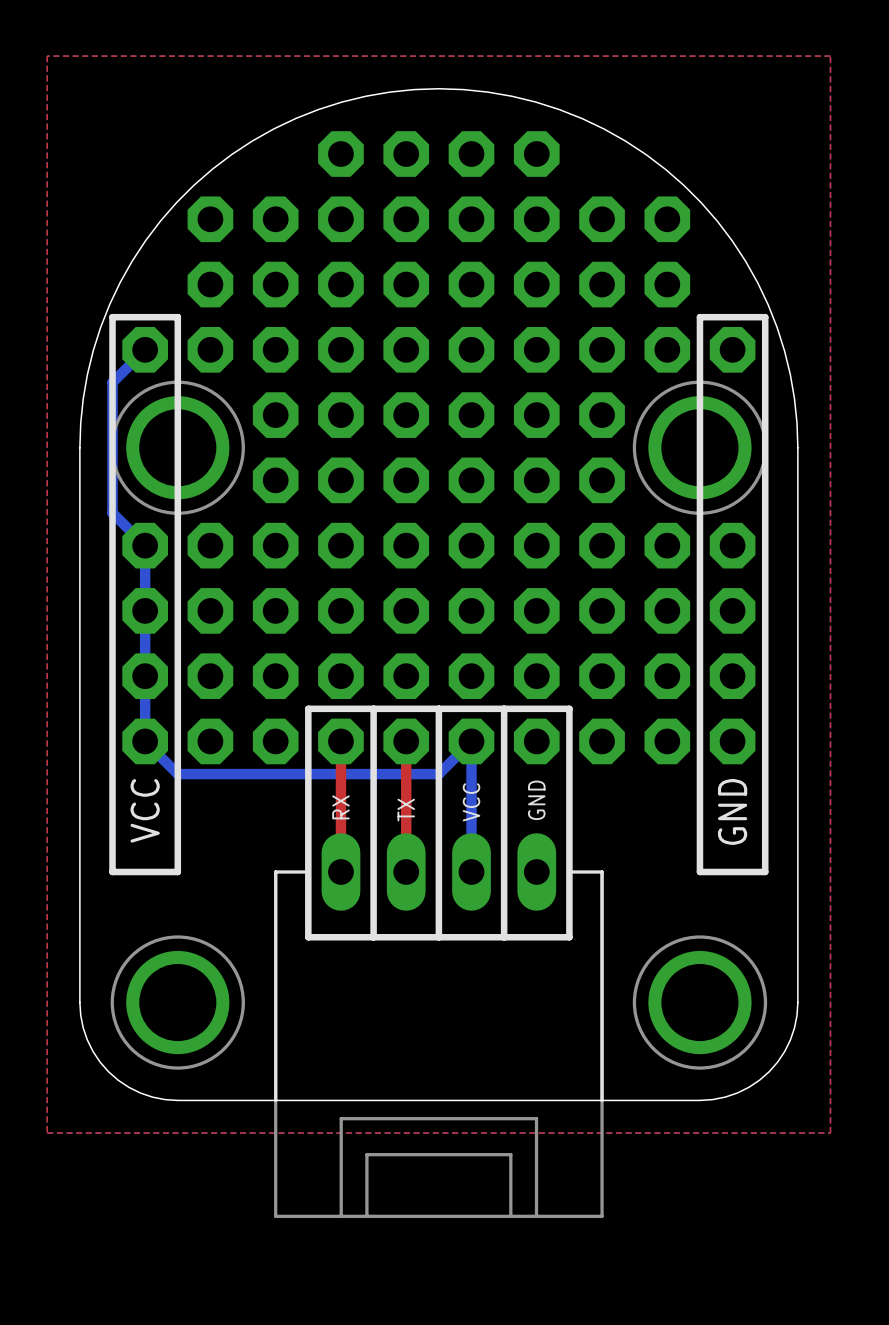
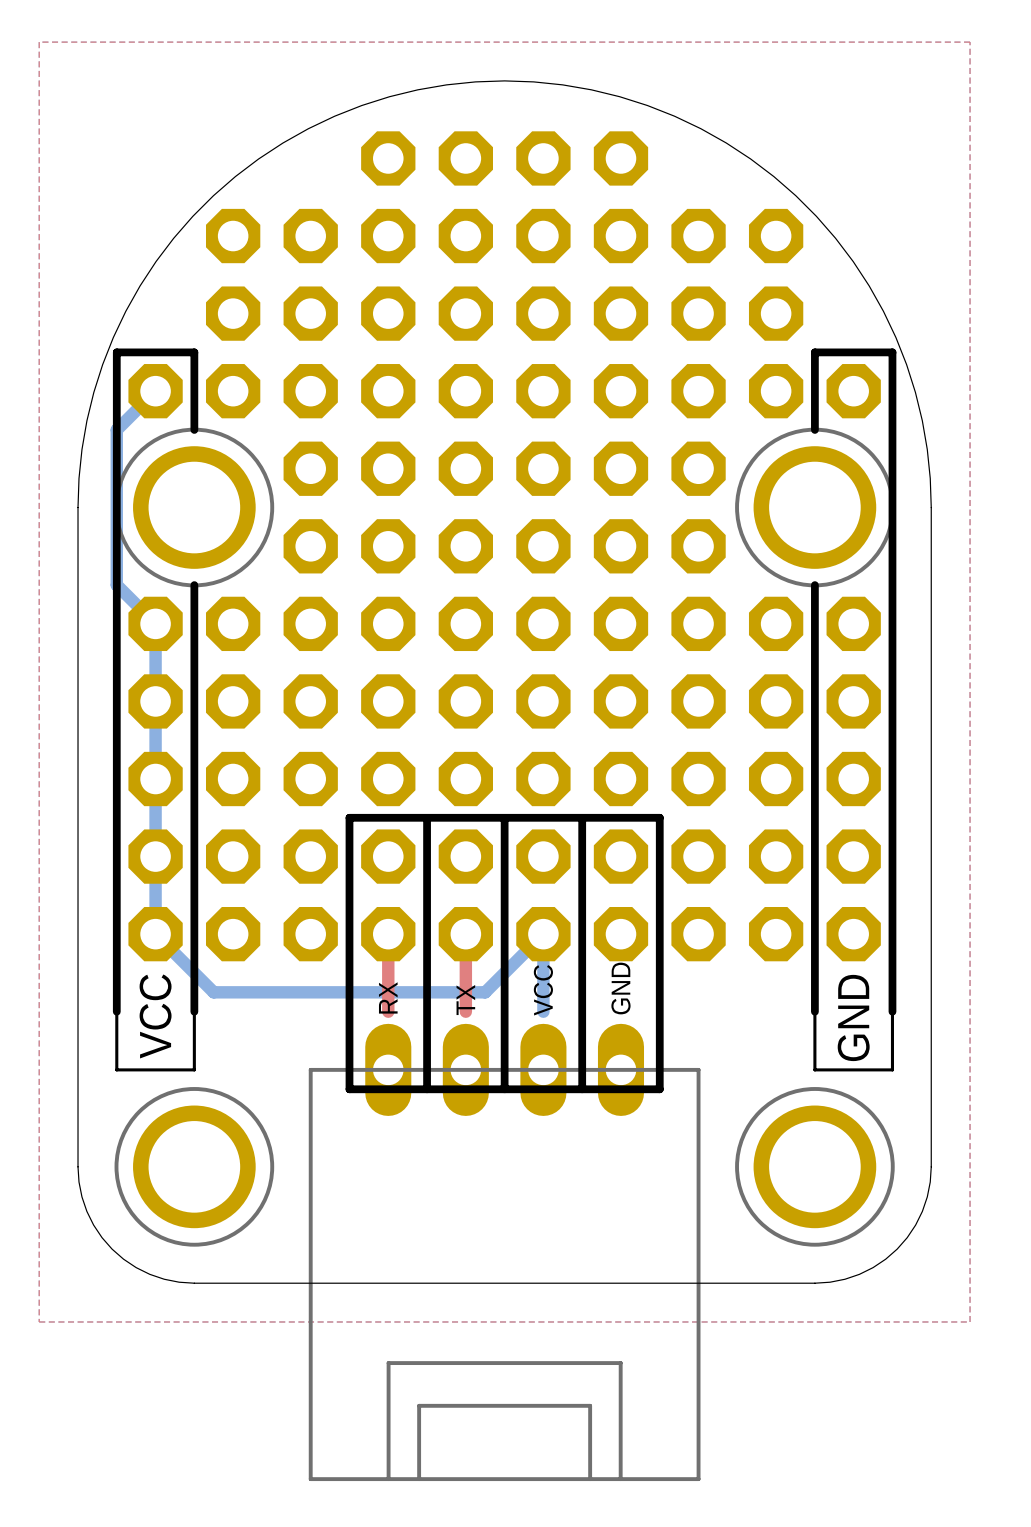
part footprint: [79, 88, 798, 1218] -> [78, 80, 932, 1482]
line: (177, 382) (177, 513) -> none
line: (699, 382) (699, 513) -> none
bottom track: (145, 741) (177, 774) (438, 774) (471, 741) (471, 806) -> (155, 856) (155, 934) (213, 992) (485, 992) (543, 934)
top track: (340, 741) (340, 806) -> none
part: (340, 741) -> none
top track: (406, 741) (406, 806) -> none
part: (406, 741) -> none
part: (471, 741) -> none
part: none -> (155, 934)
part: none -> (388, 934)
part: none -> (465, 934)
part: none -> (543, 934)
part: none -> (620, 934)
part: none -> (853, 934)
text position: VCC (145, 810) -> VCC (155, 1016)
text position: GND (732, 811) -> GND (853, 1017)
line: (112, 871) (177, 871) -> (116, 1011) (116, 1069) (194, 1069) (194, 1011)
line: (699, 871) (765, 871) -> (814, 1011) (814, 1069) (892, 1069) (892, 1011)

